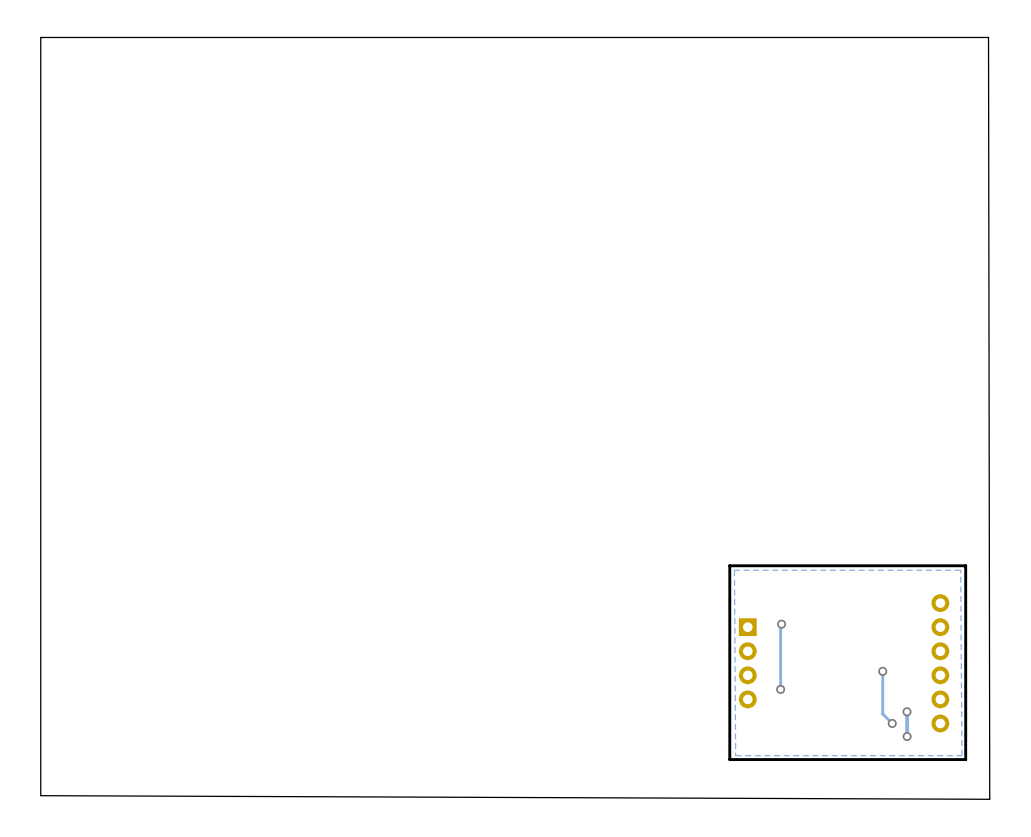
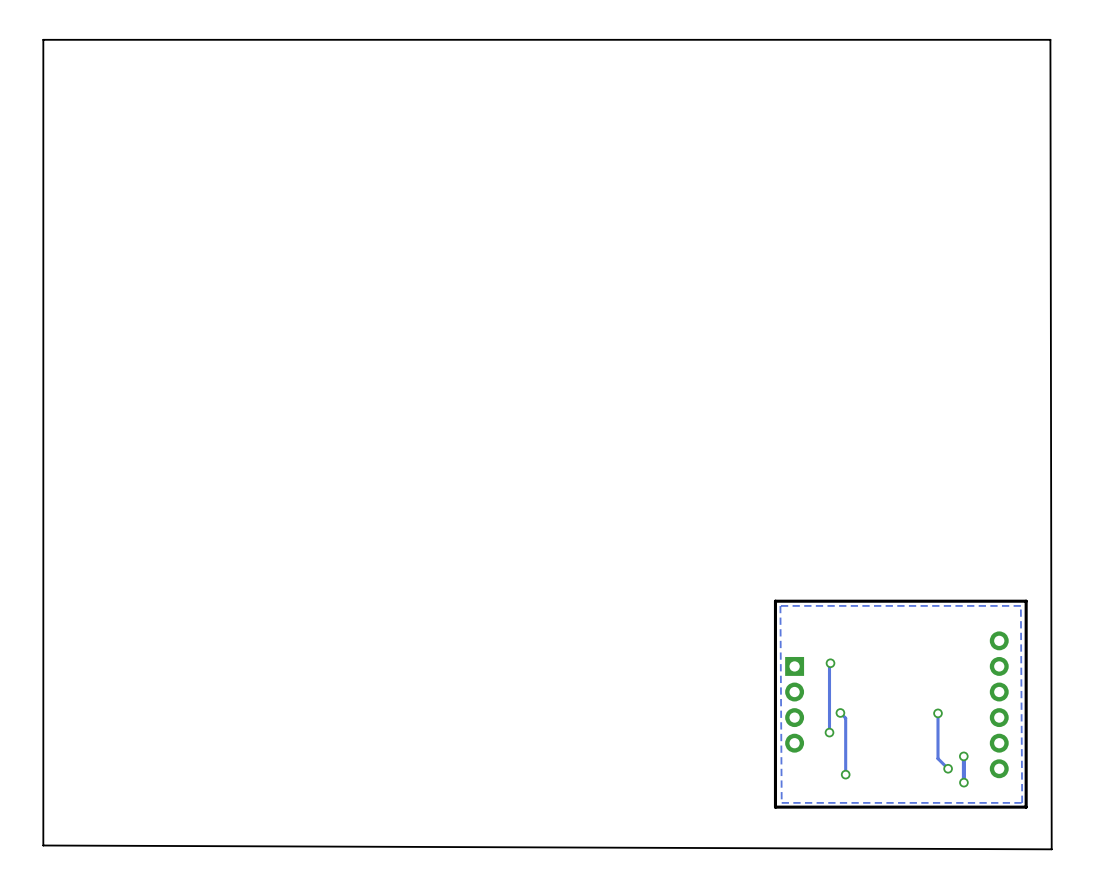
track: none -> (840, 712) (845, 718) (845, 774)
via: none -> (840, 712)
via: none -> (845, 774)

